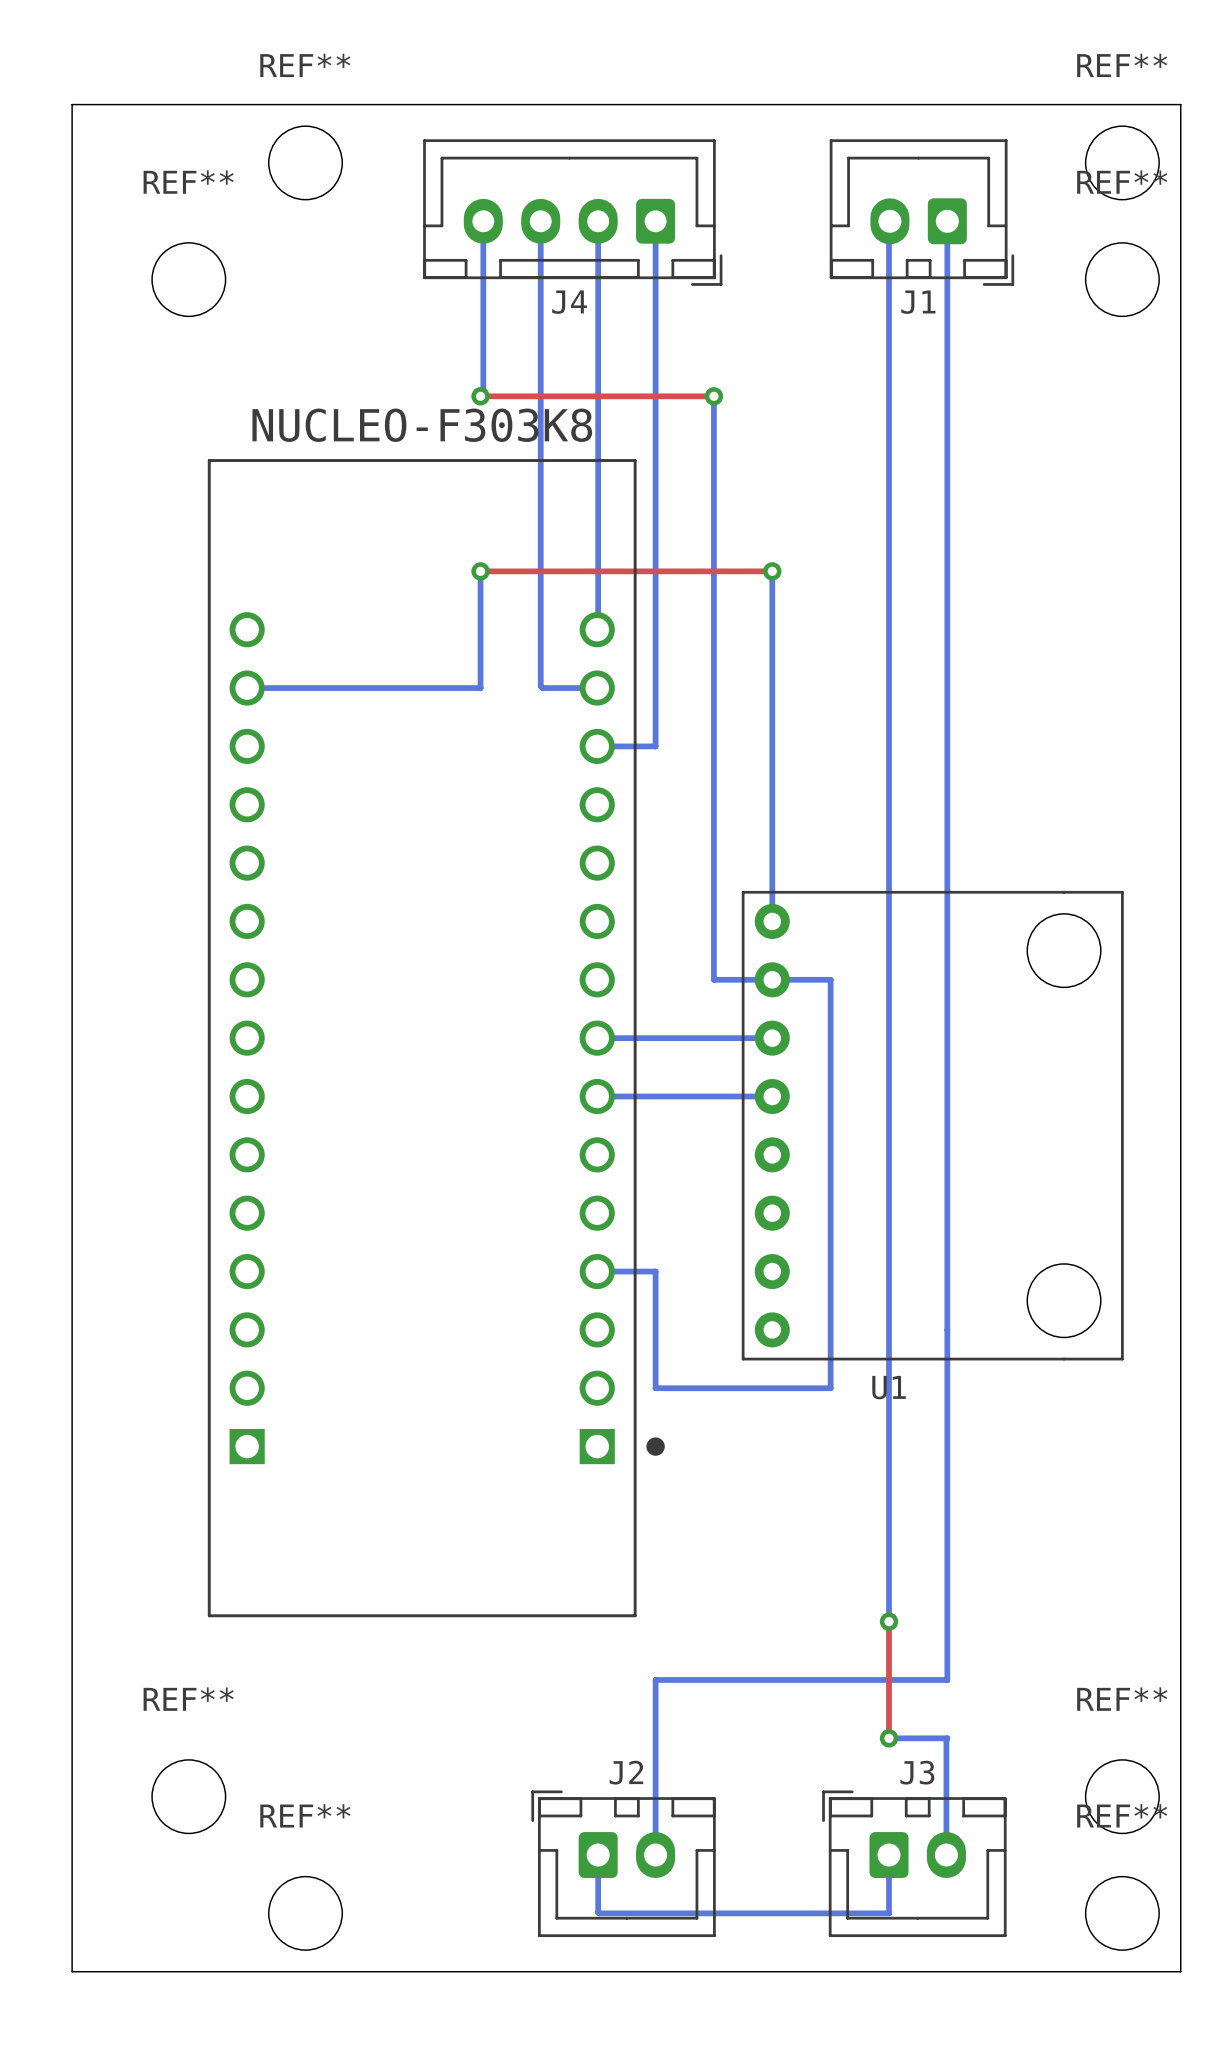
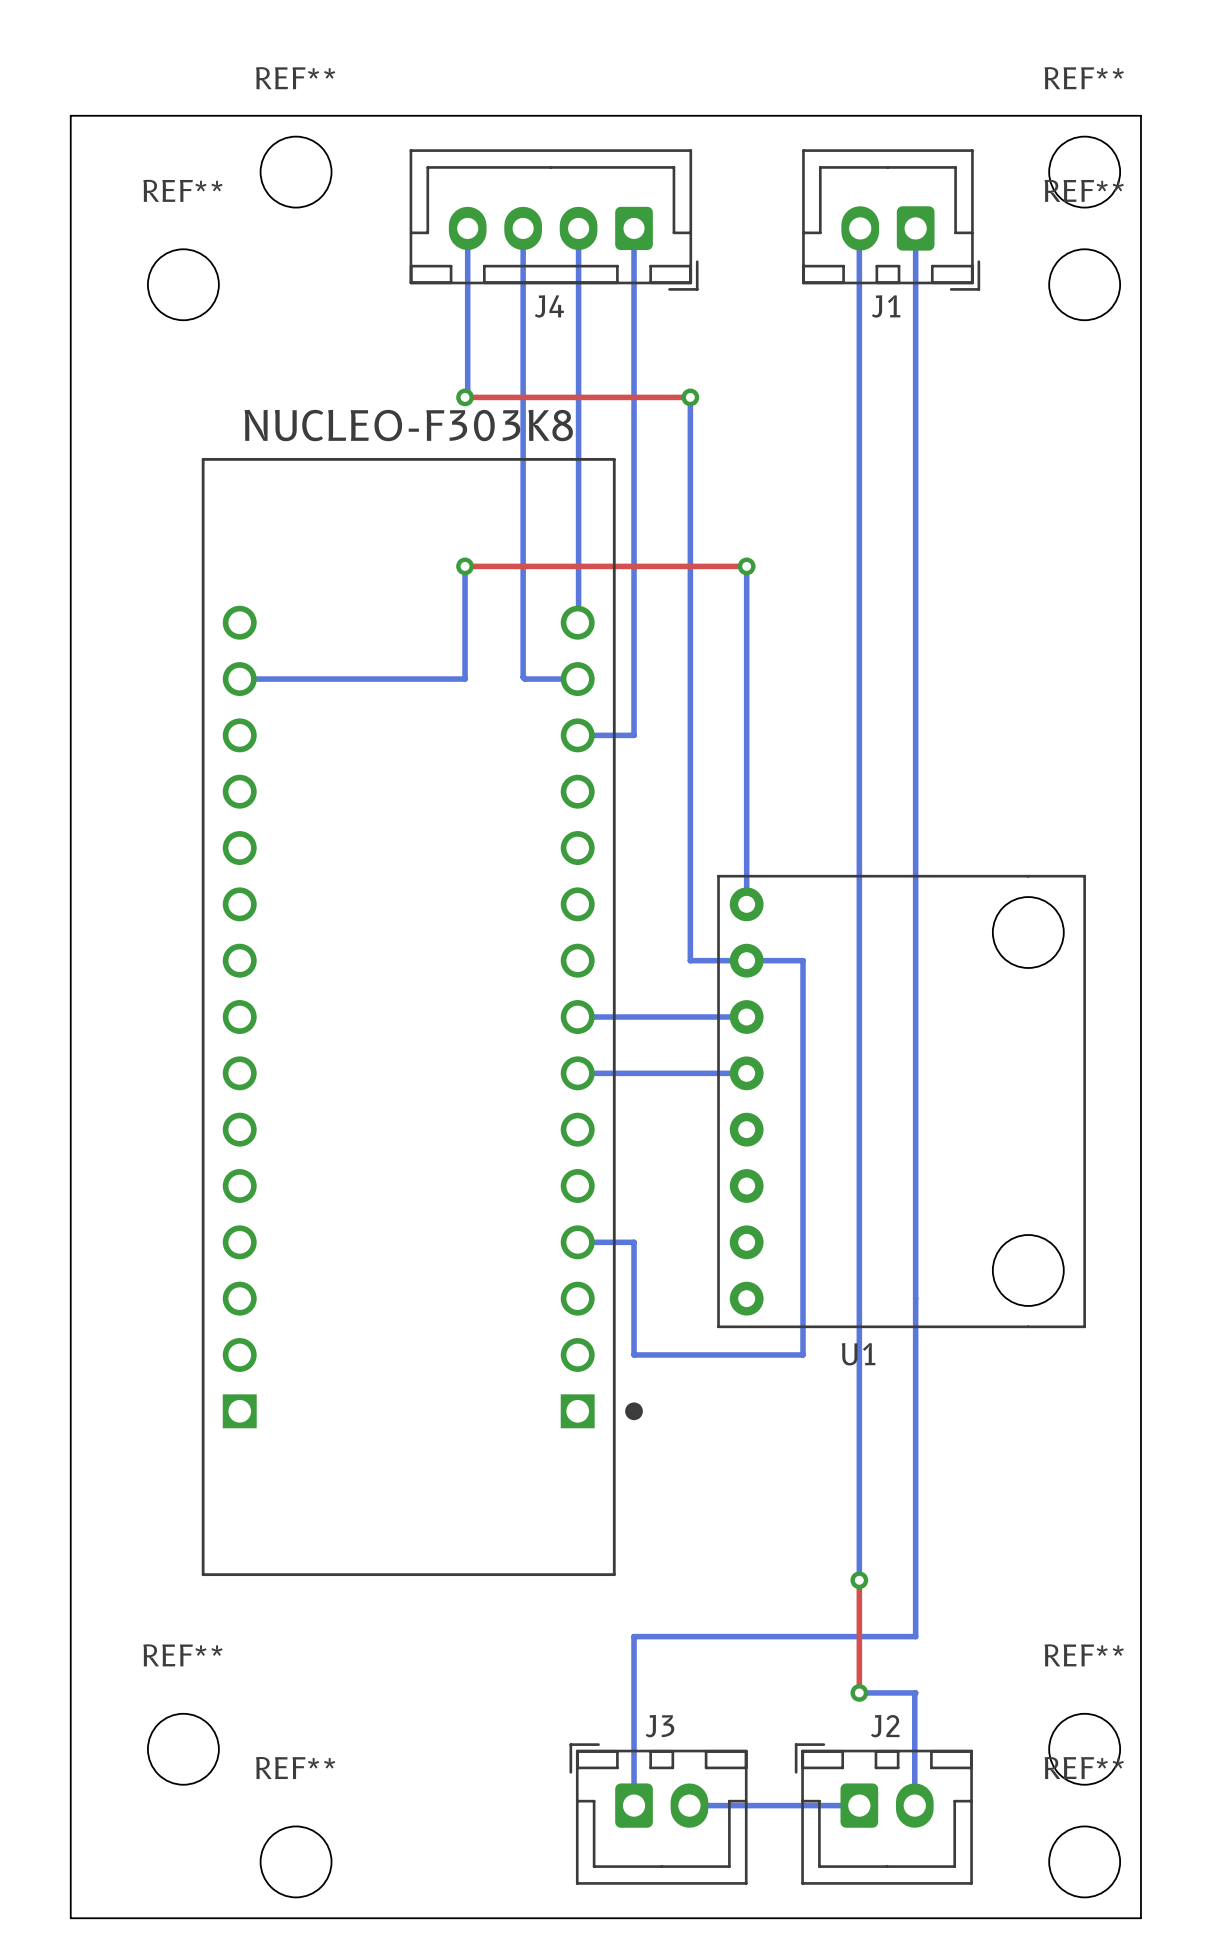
J3 name: J3 (917, 1772) -> J2 (885, 1726)
bottom track: (598, 1855) (599, 1913) (888, 1913) (888, 1855) -> (689, 1805) (859, 1805)
J2: (623, 1863) -> none
J3: none -> (658, 1814)

